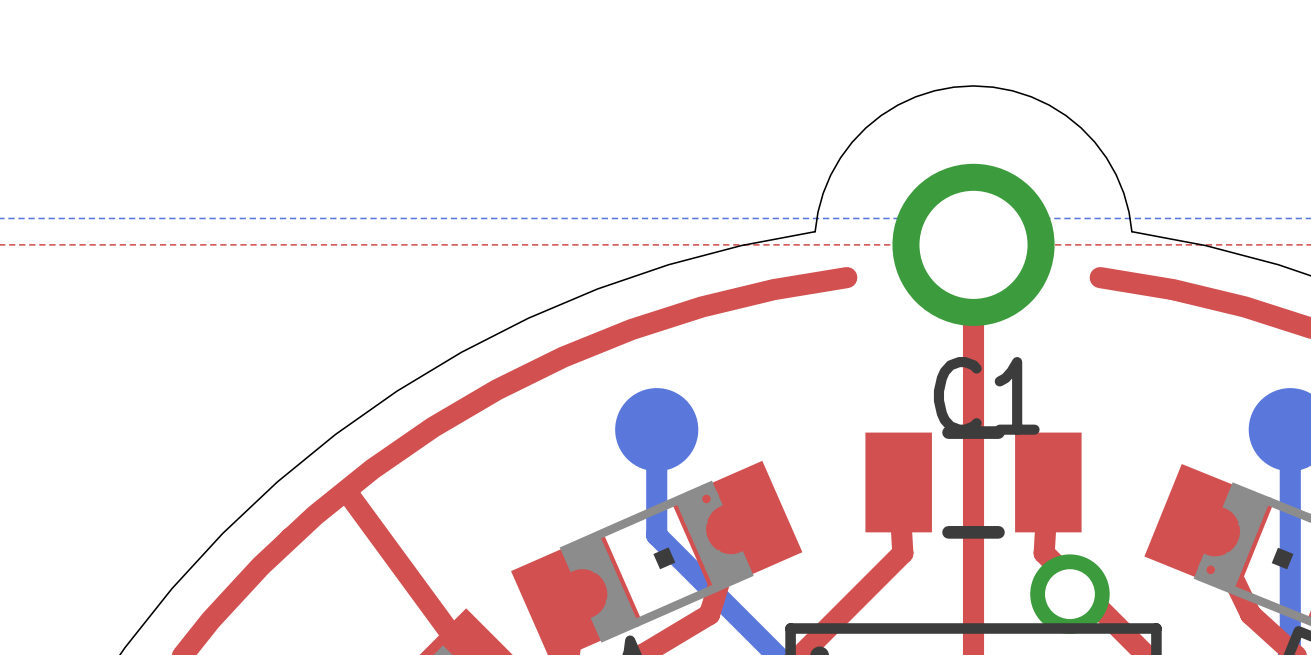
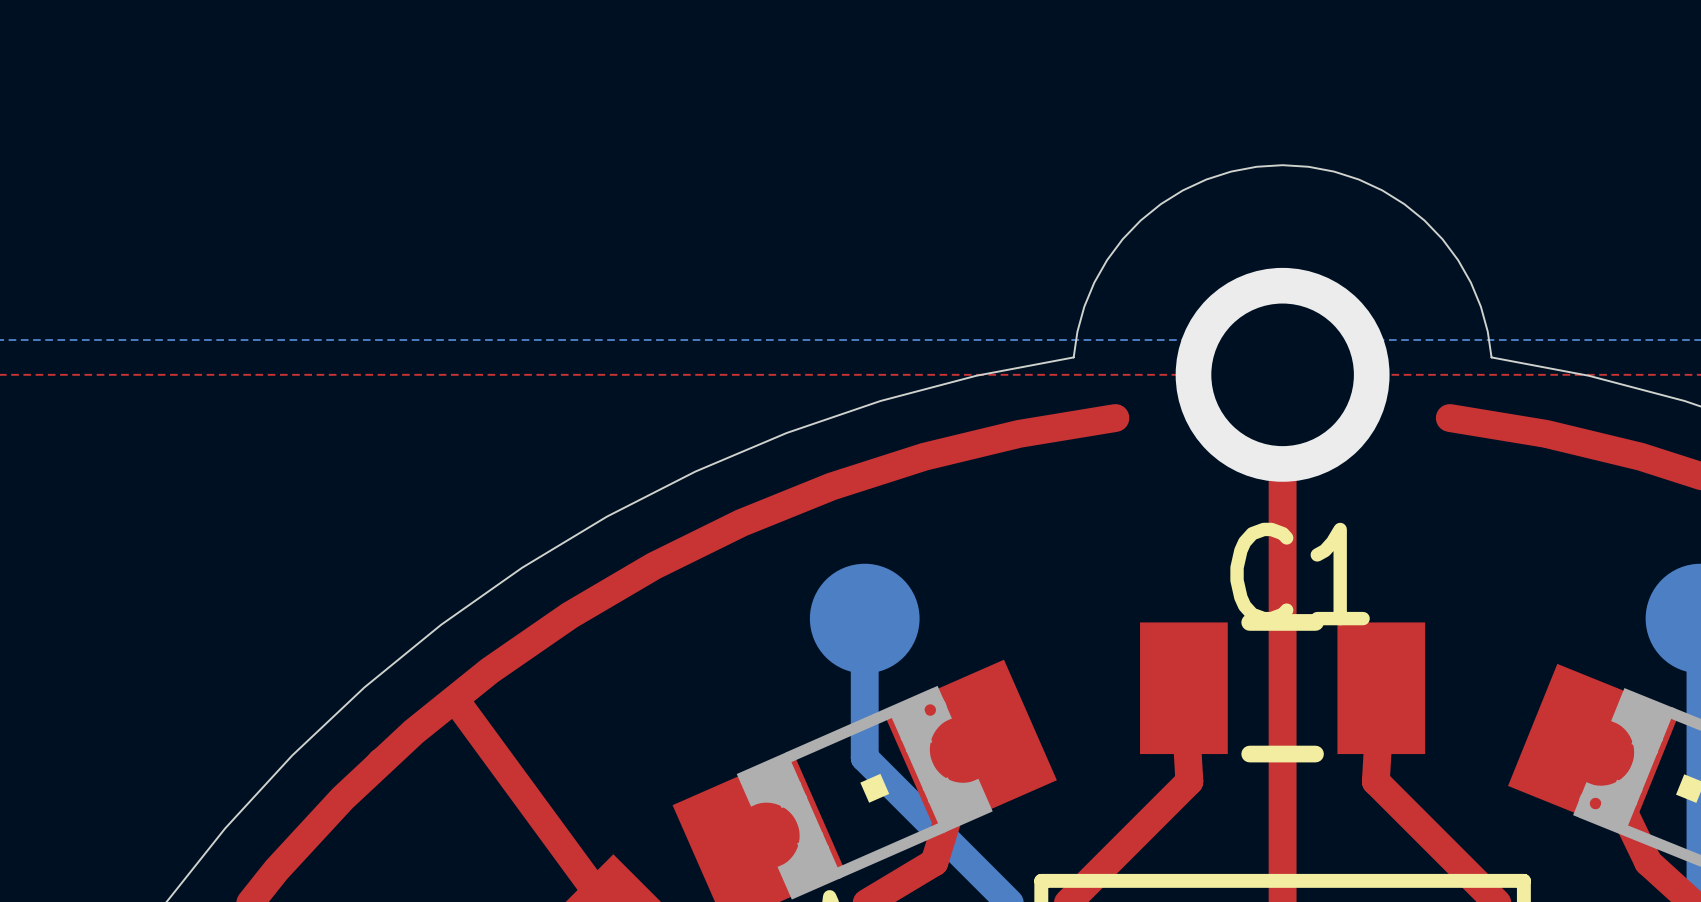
via: (1069, 594) -> none

